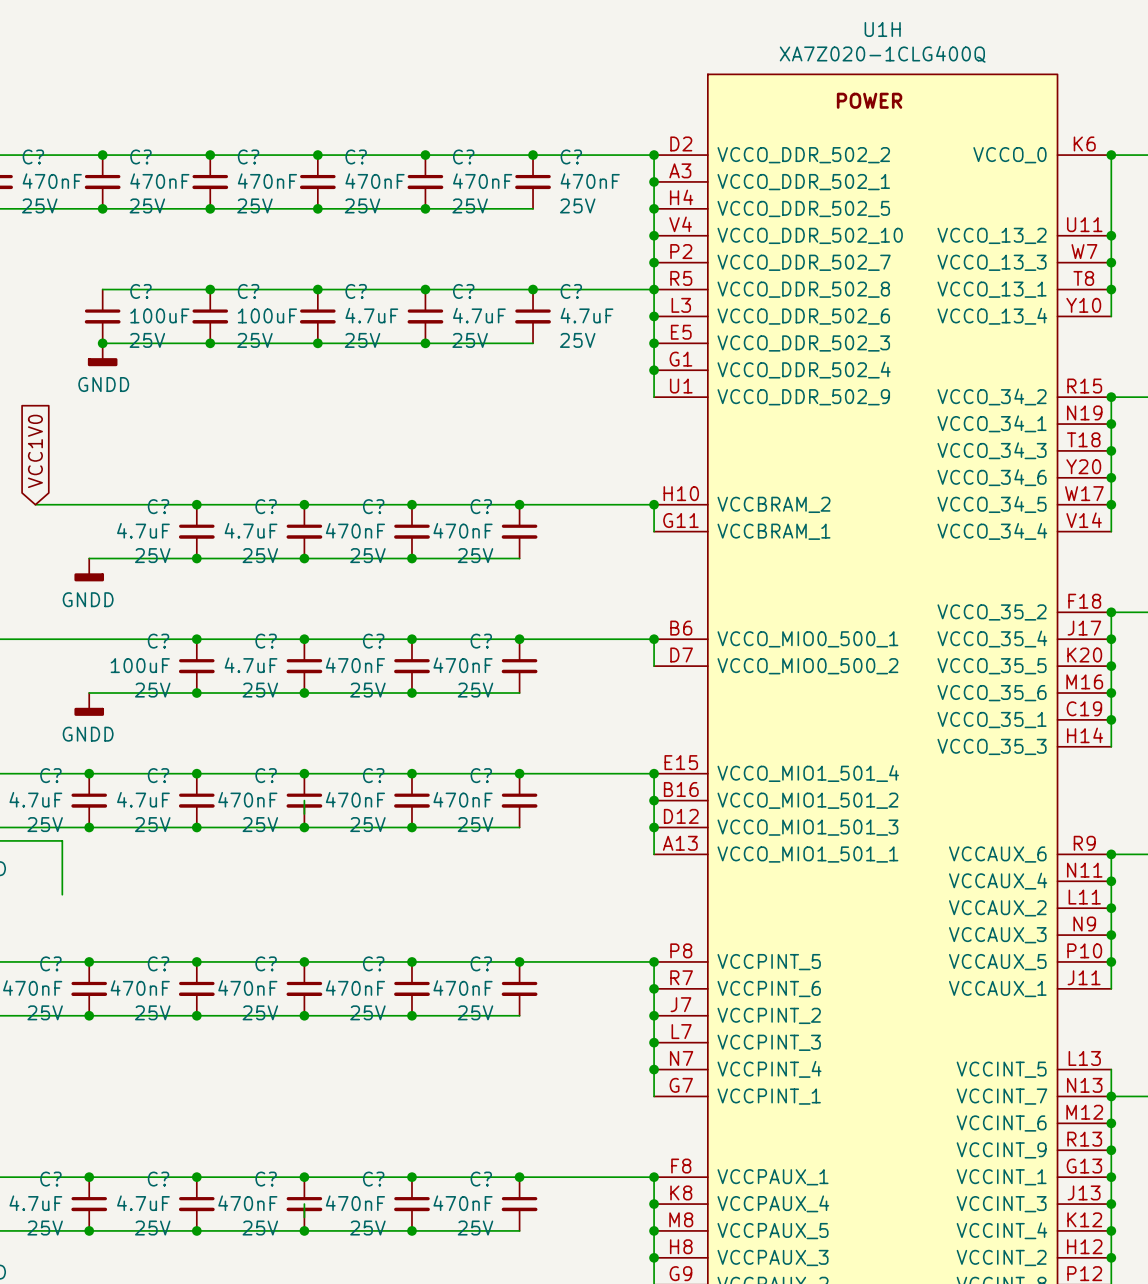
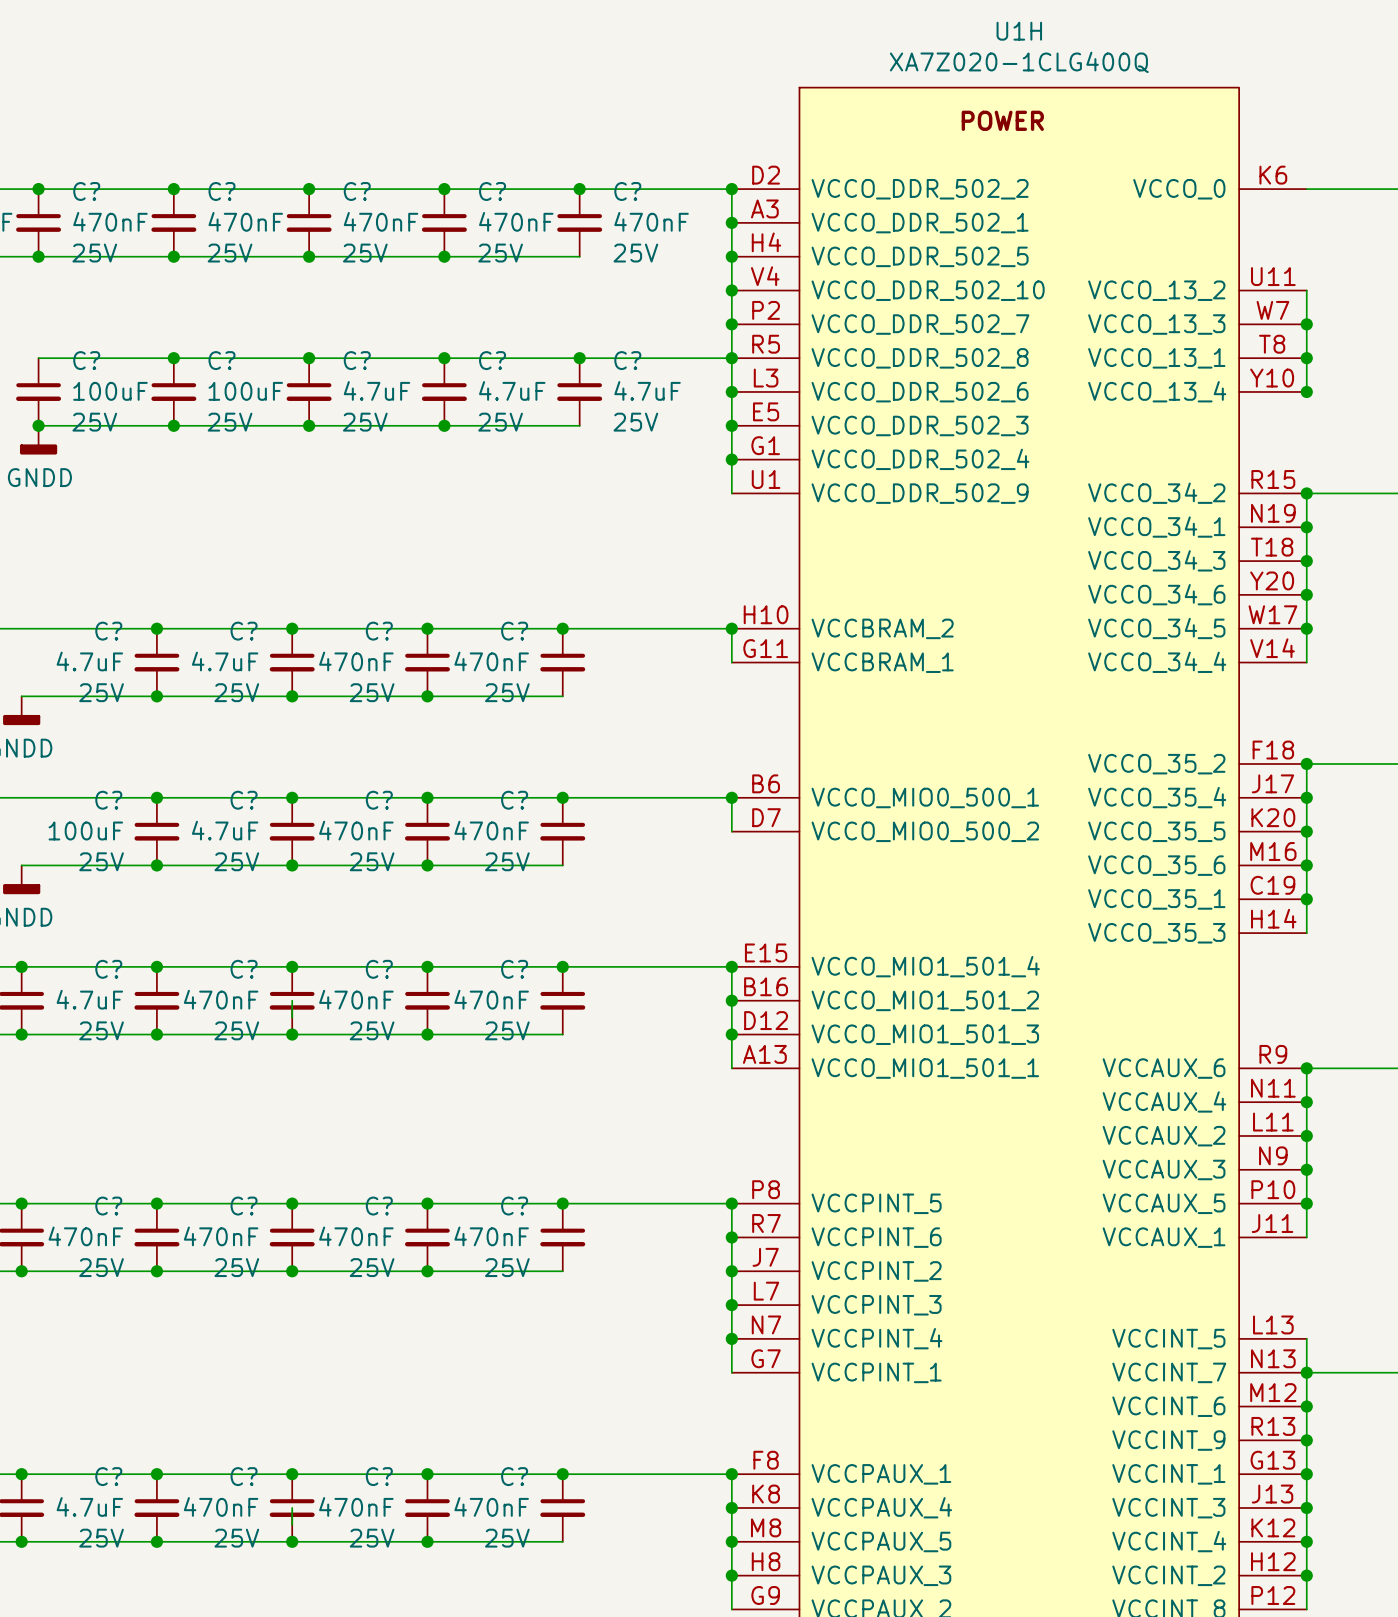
wire: (1111, 155) (1111, 235) -> none
junction: (1111, 155) -> none
junction: (1111, 235) -> none
junction: none -> (1306, 391)

